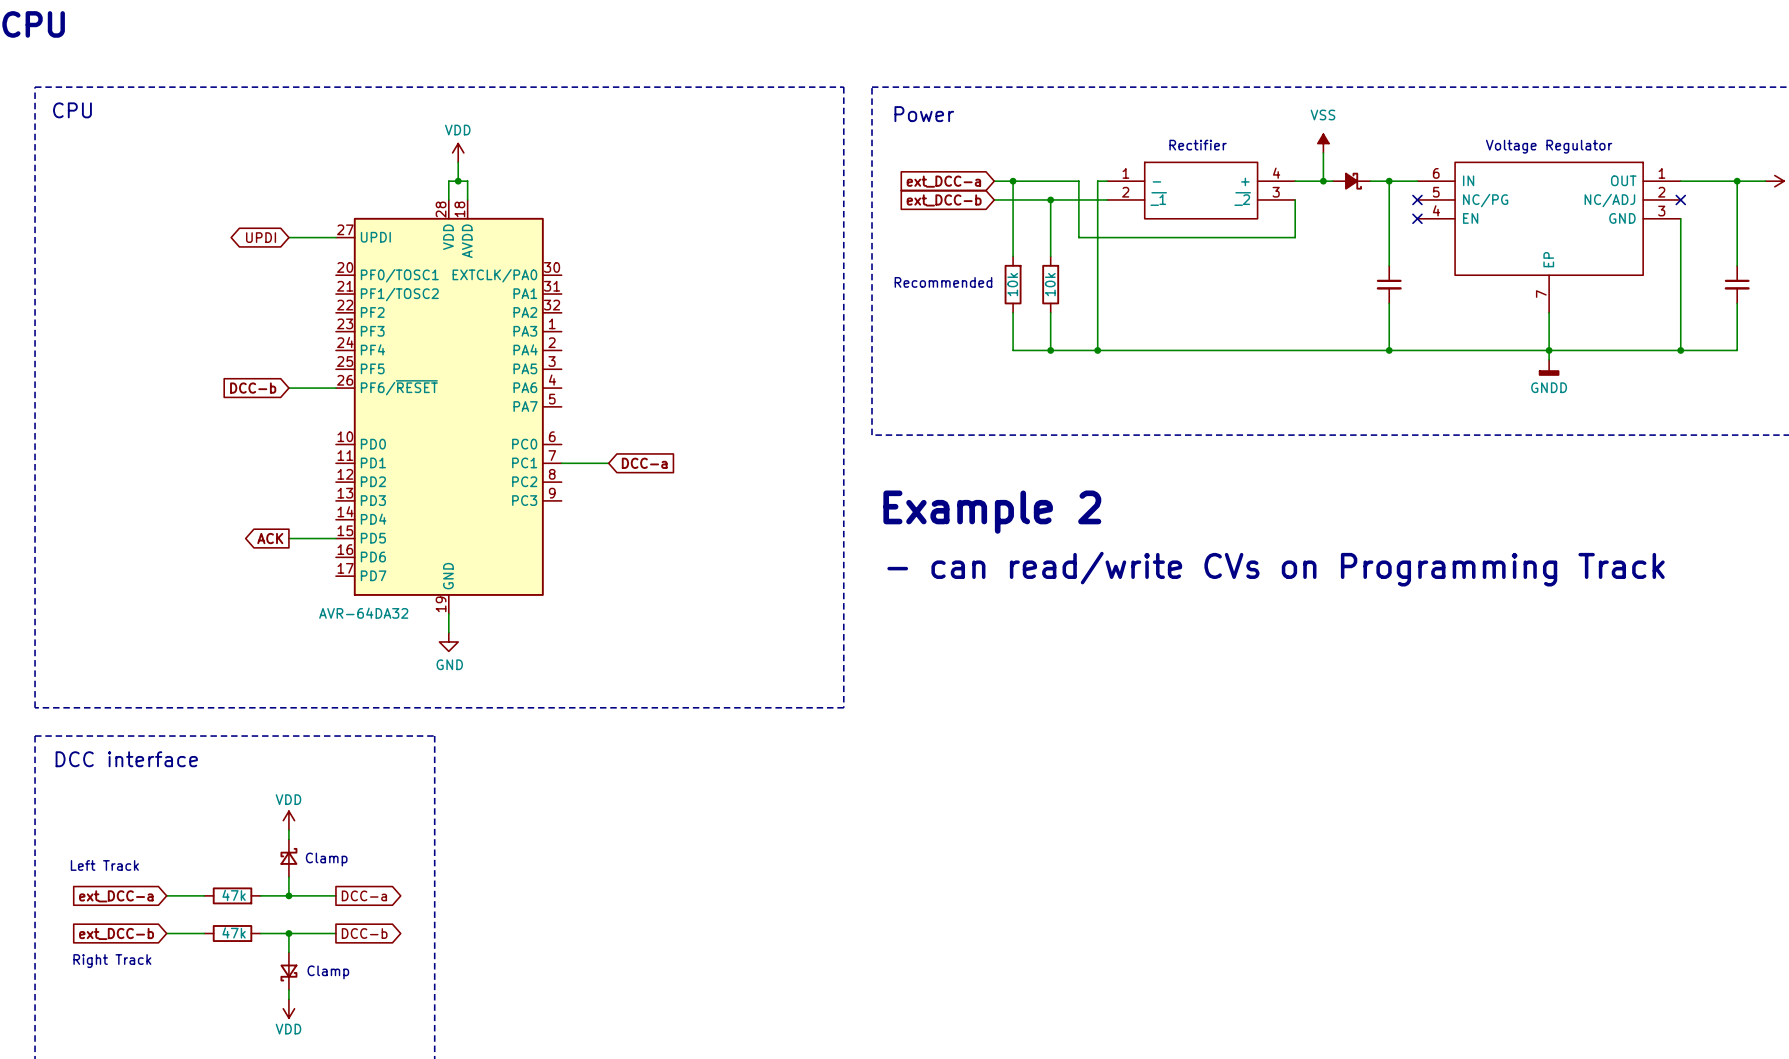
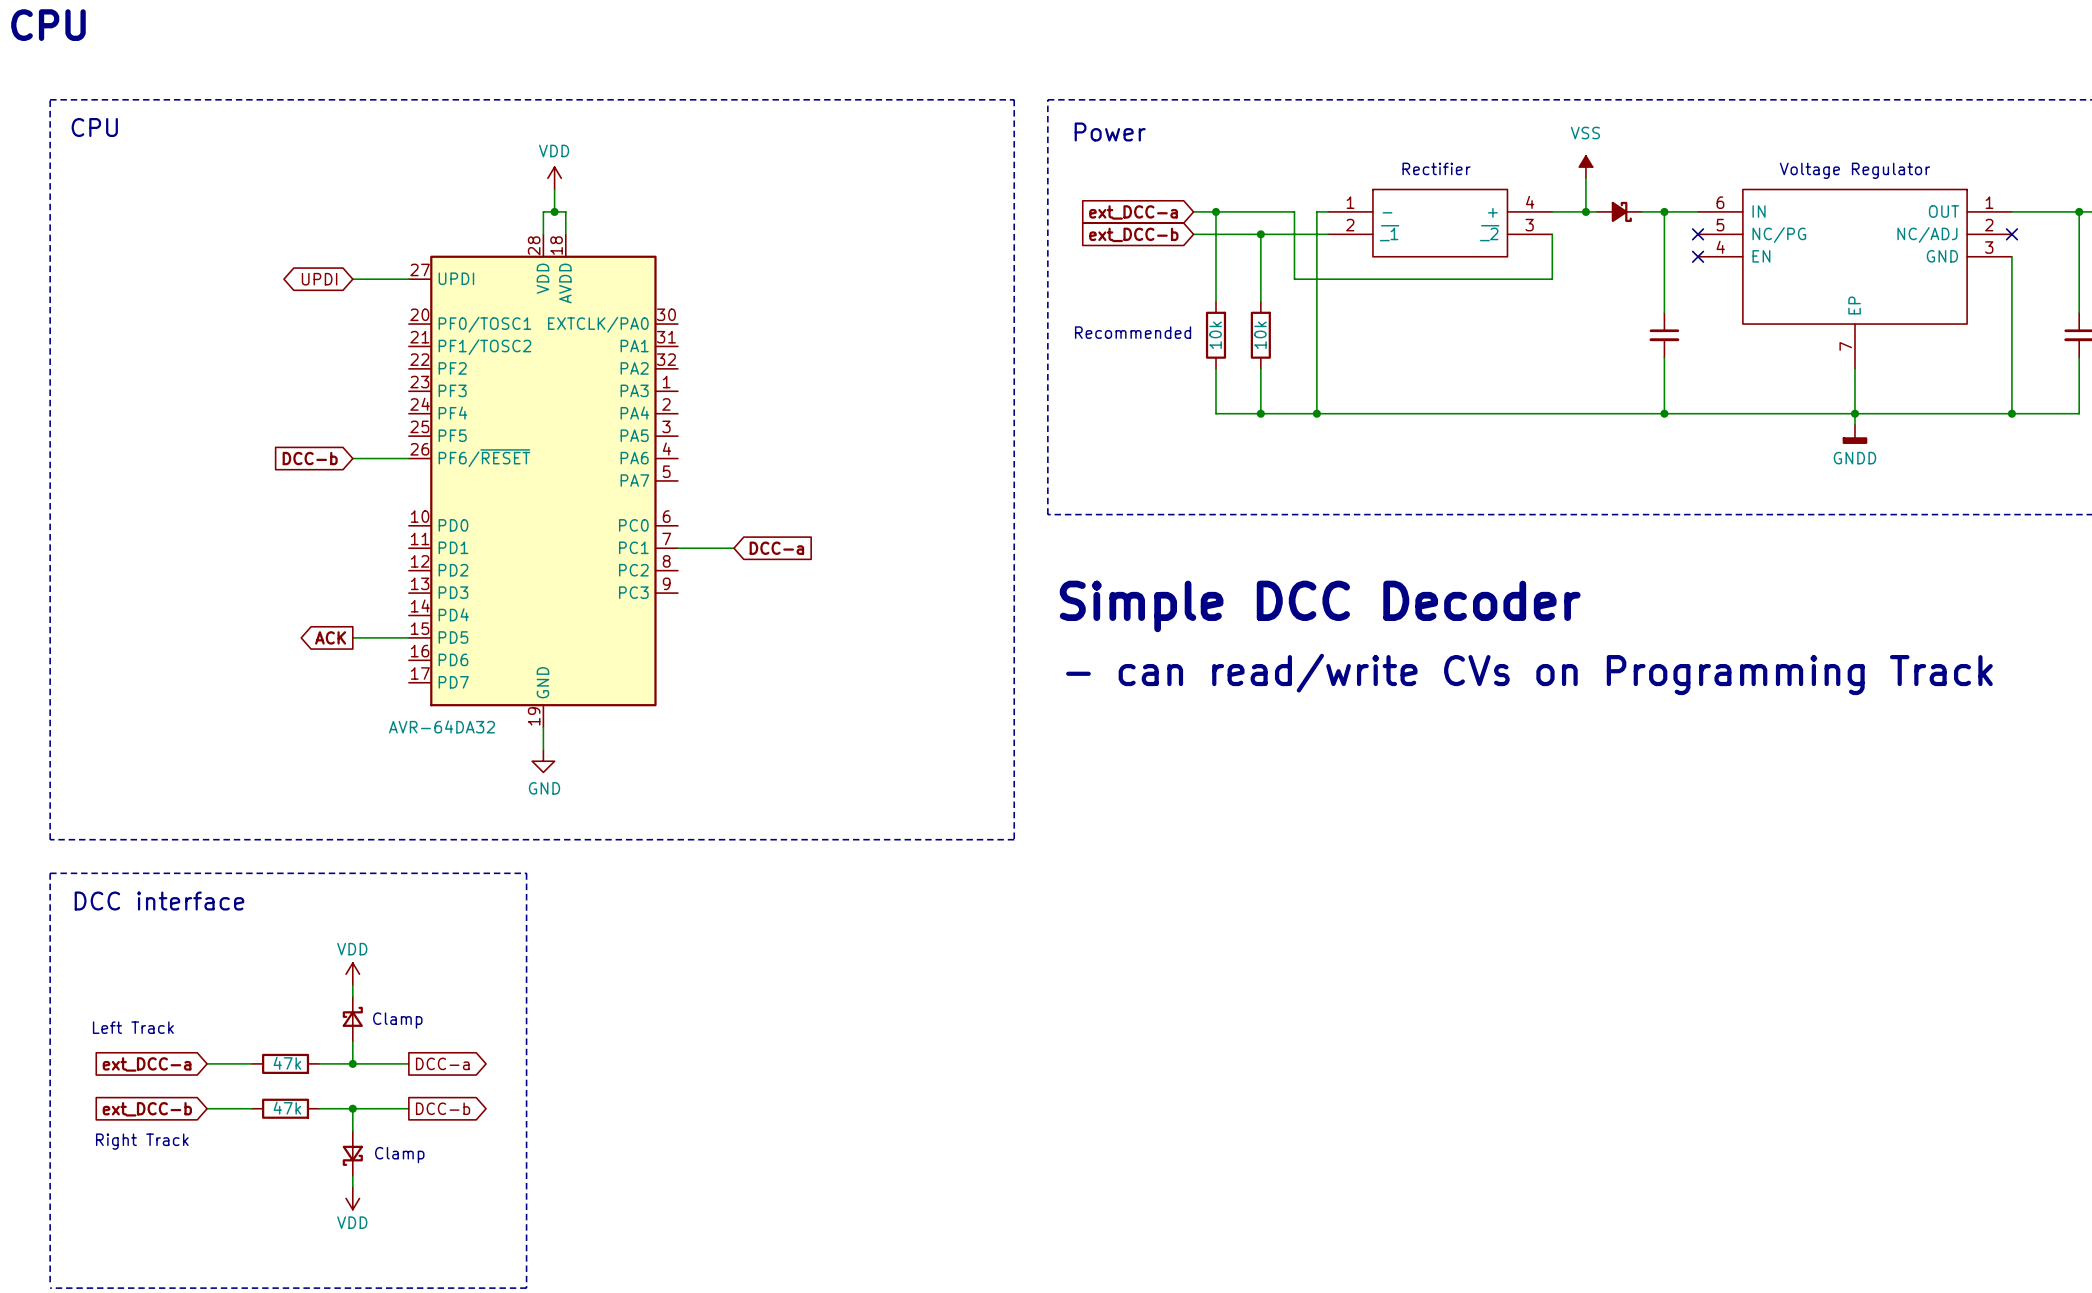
text: Example 2 (992, 512) -> Simple DCC Decoder (1320, 606)

